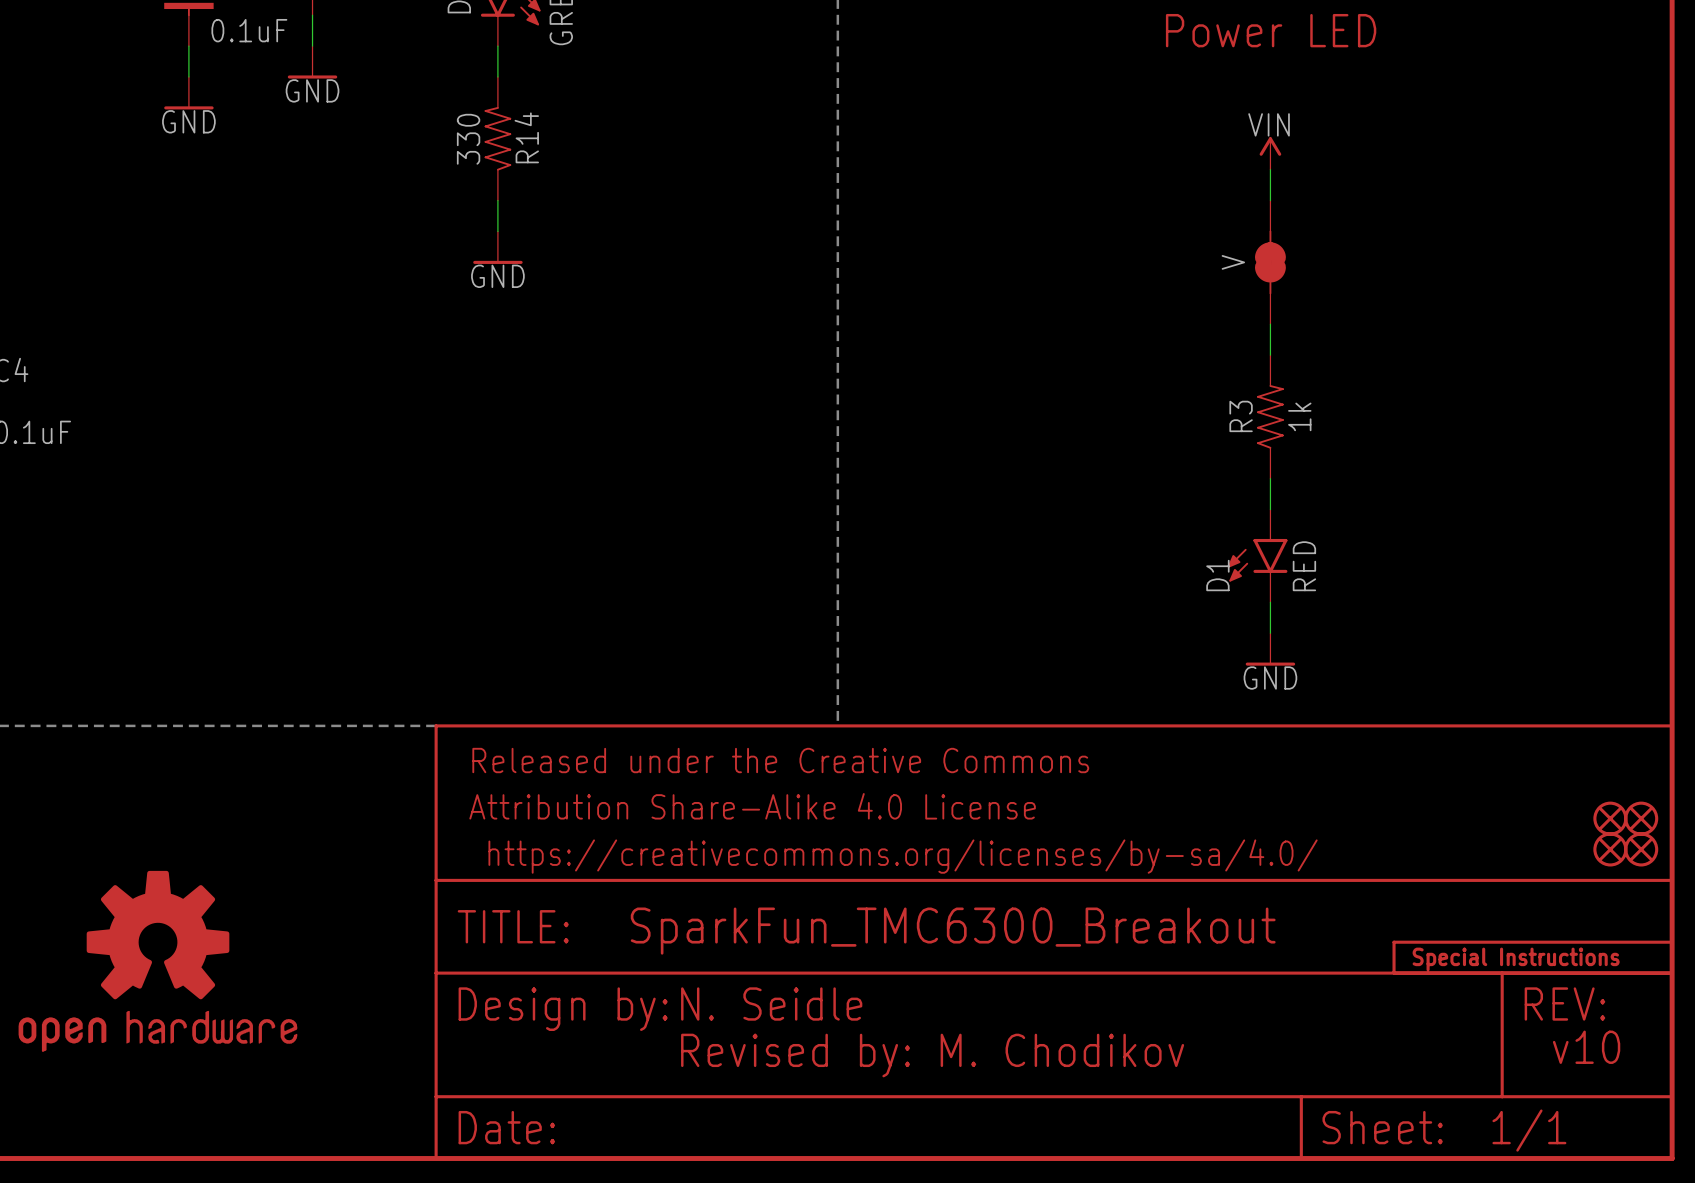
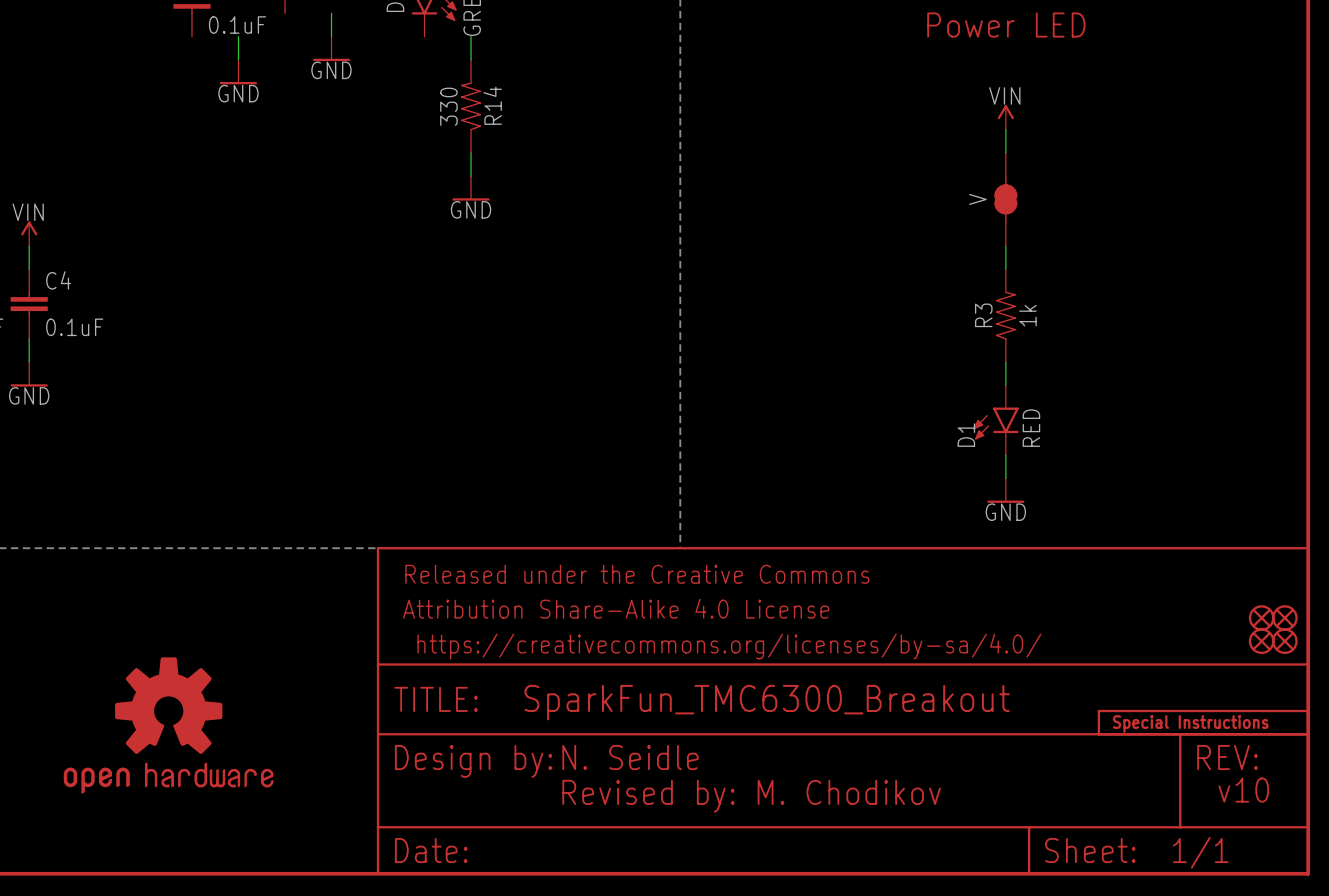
wire: (312, 15) (312, 46) -> (331, 13) (331, 36)
wire: (188, 46) (188, 76) -> (238, 36) (238, 59)
wire: (497, 46) (497, 76) -> (471, 36) (471, 59)
power symbol: GND (312, 62) -> none
power symbol: none -> GND (331, 48)
power symbol: GND (188, 93) -> none
power symbol: none -> GND (238, 72)
R14 position: (497, 138) -> (471, 106)
wire: (497, 200) (497, 231) -> (471, 152) (471, 176)
power symbol position: GND (497, 247) -> GND (471, 188)

